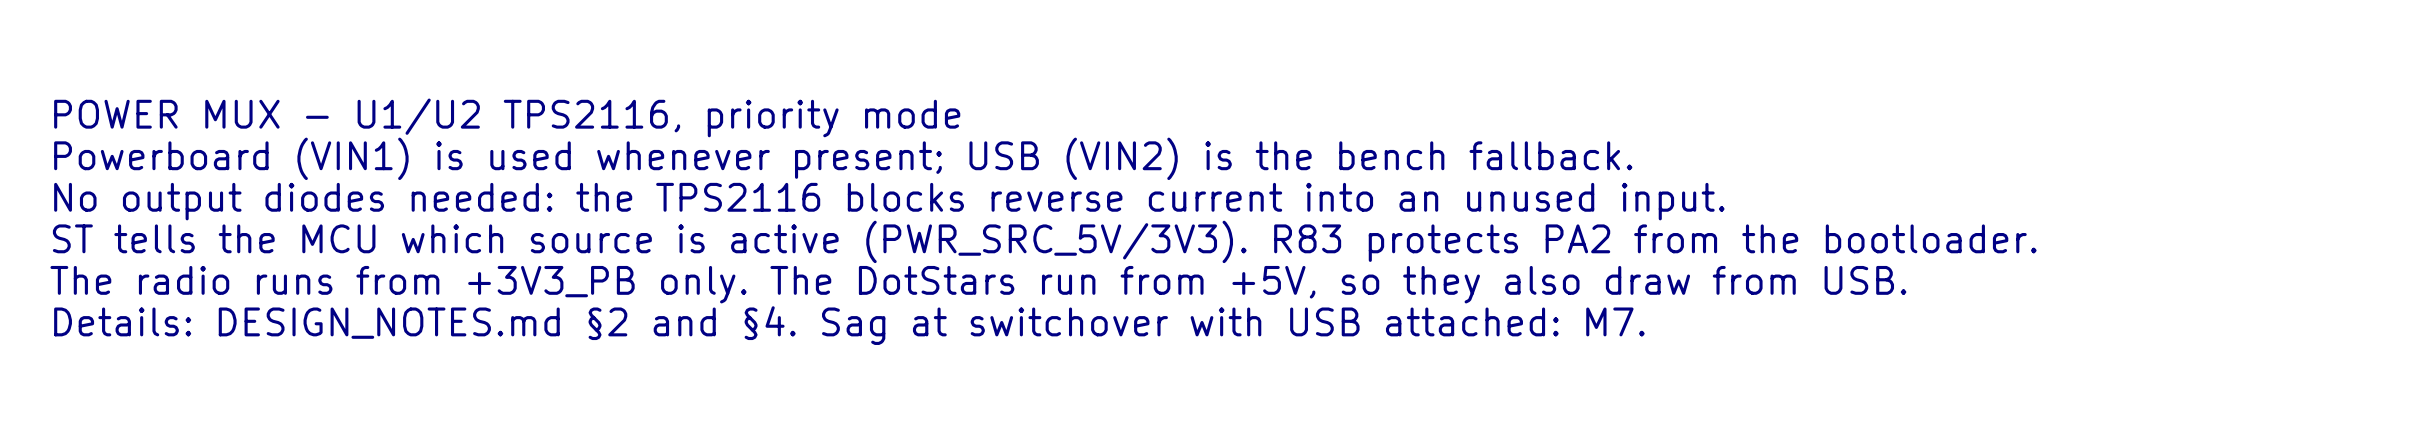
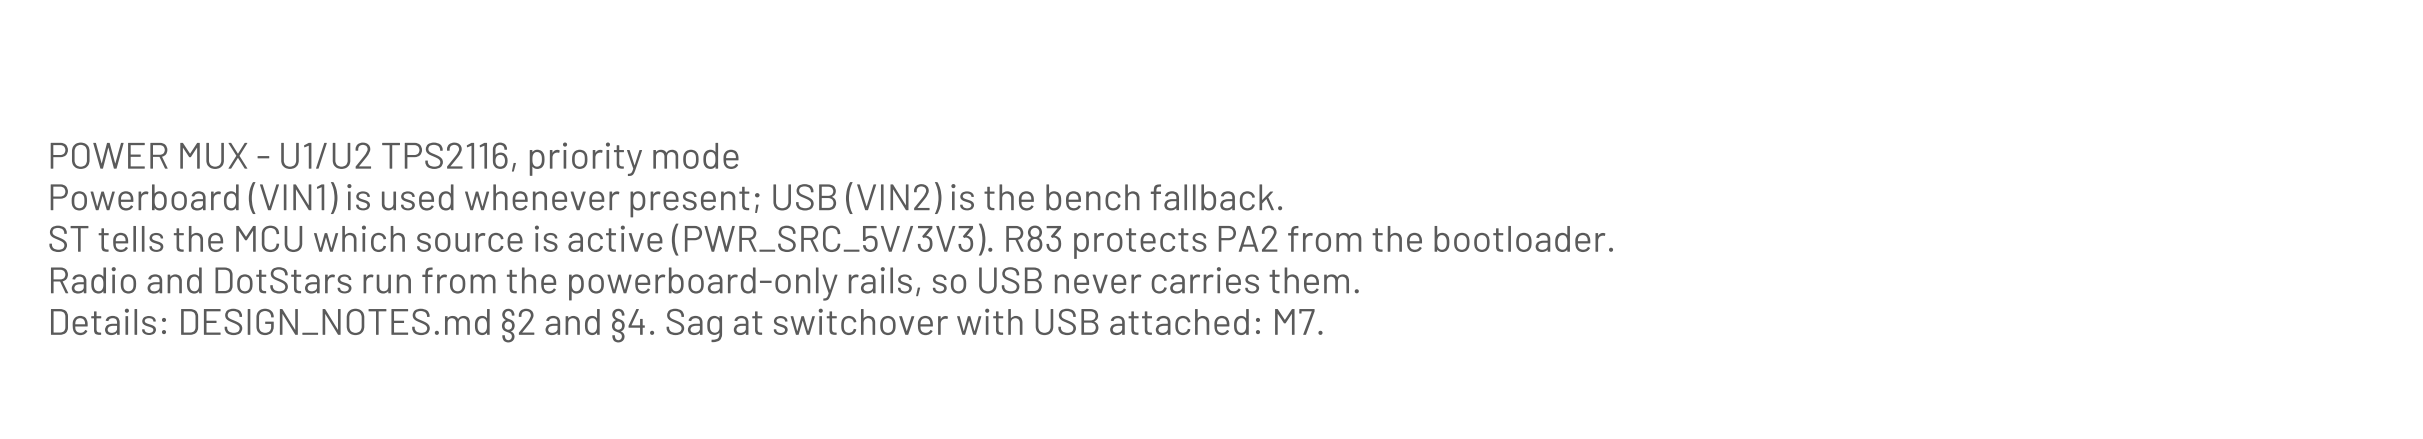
text: POWER MUX - U1/U2 TPS2116, priority mode (507, 117) -> none
text: Powerboard (VIN1) is used whenever present; USB (VIN2) is the bench fallback. (843, 158) -> POWER MUX - U1/U2 TPS2116, priority mode (394, 159)
text: No output diodes needed: the TPS2116 blocks reverse current into an unused input. (889, 201) -> Powerboard (VIN1) is used whenever present; USB (VIN2) is the bench fallback. (666, 199)
text: The radio runs from +3V3_PB only. The DotStars run from +5V, so they also draw from USB. (978, 284) -> Radio and DotStars run from the powerboard-only rails, so USB never carries them. (704, 283)

